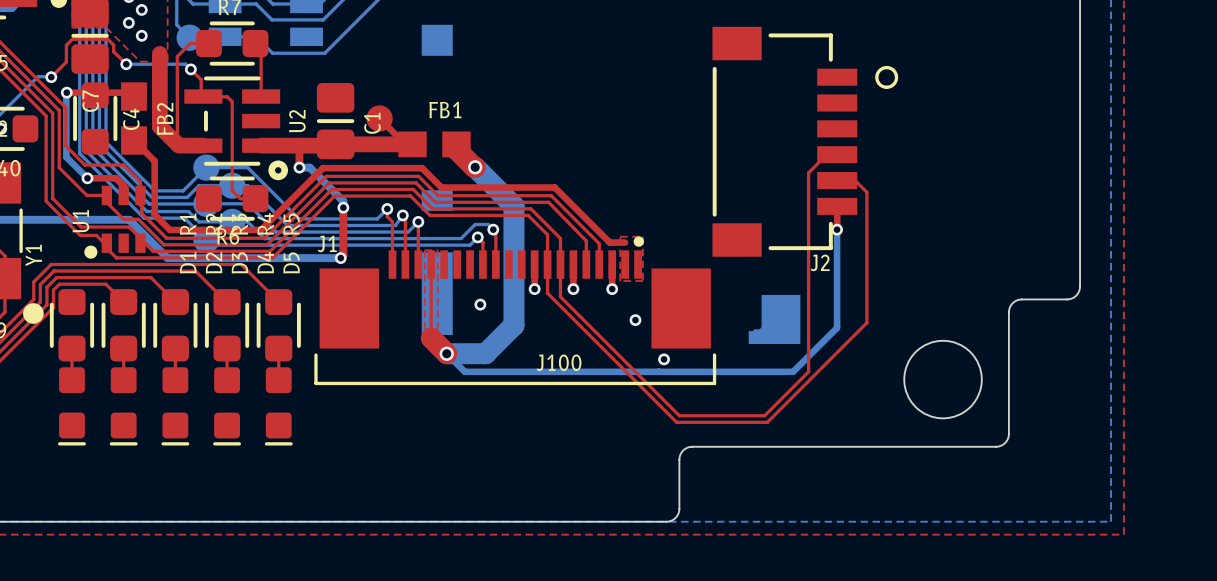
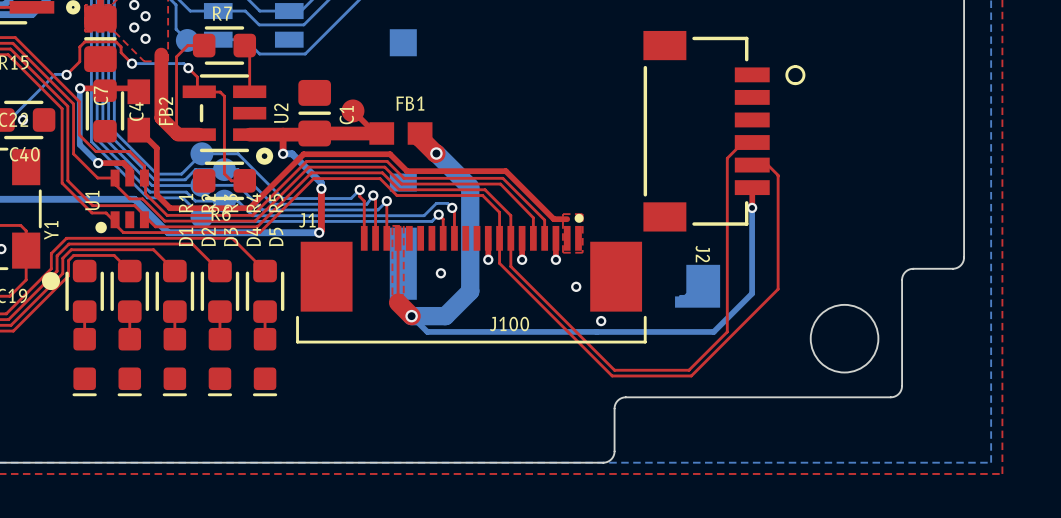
J2 name rotation: 0° (820, 262) -> 90° clockwise (702, 254)
J2 name position: J2 (820, 262) -> J2 (702, 254)

